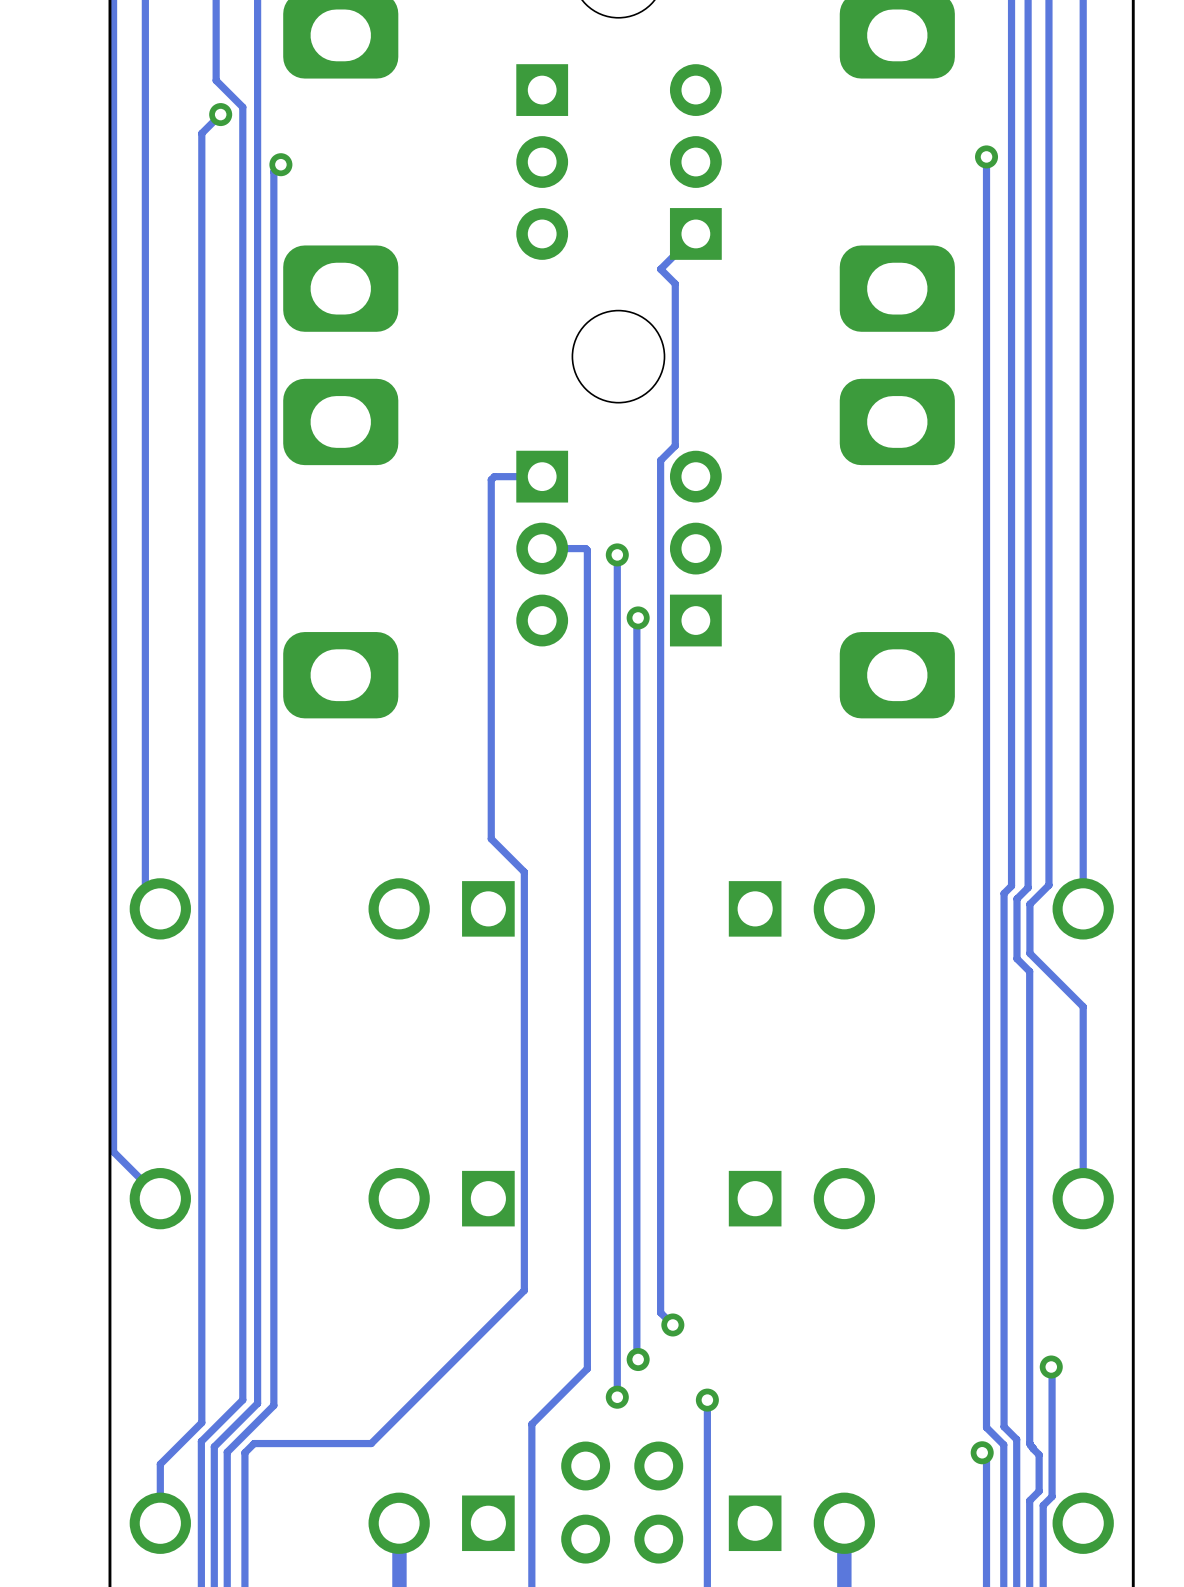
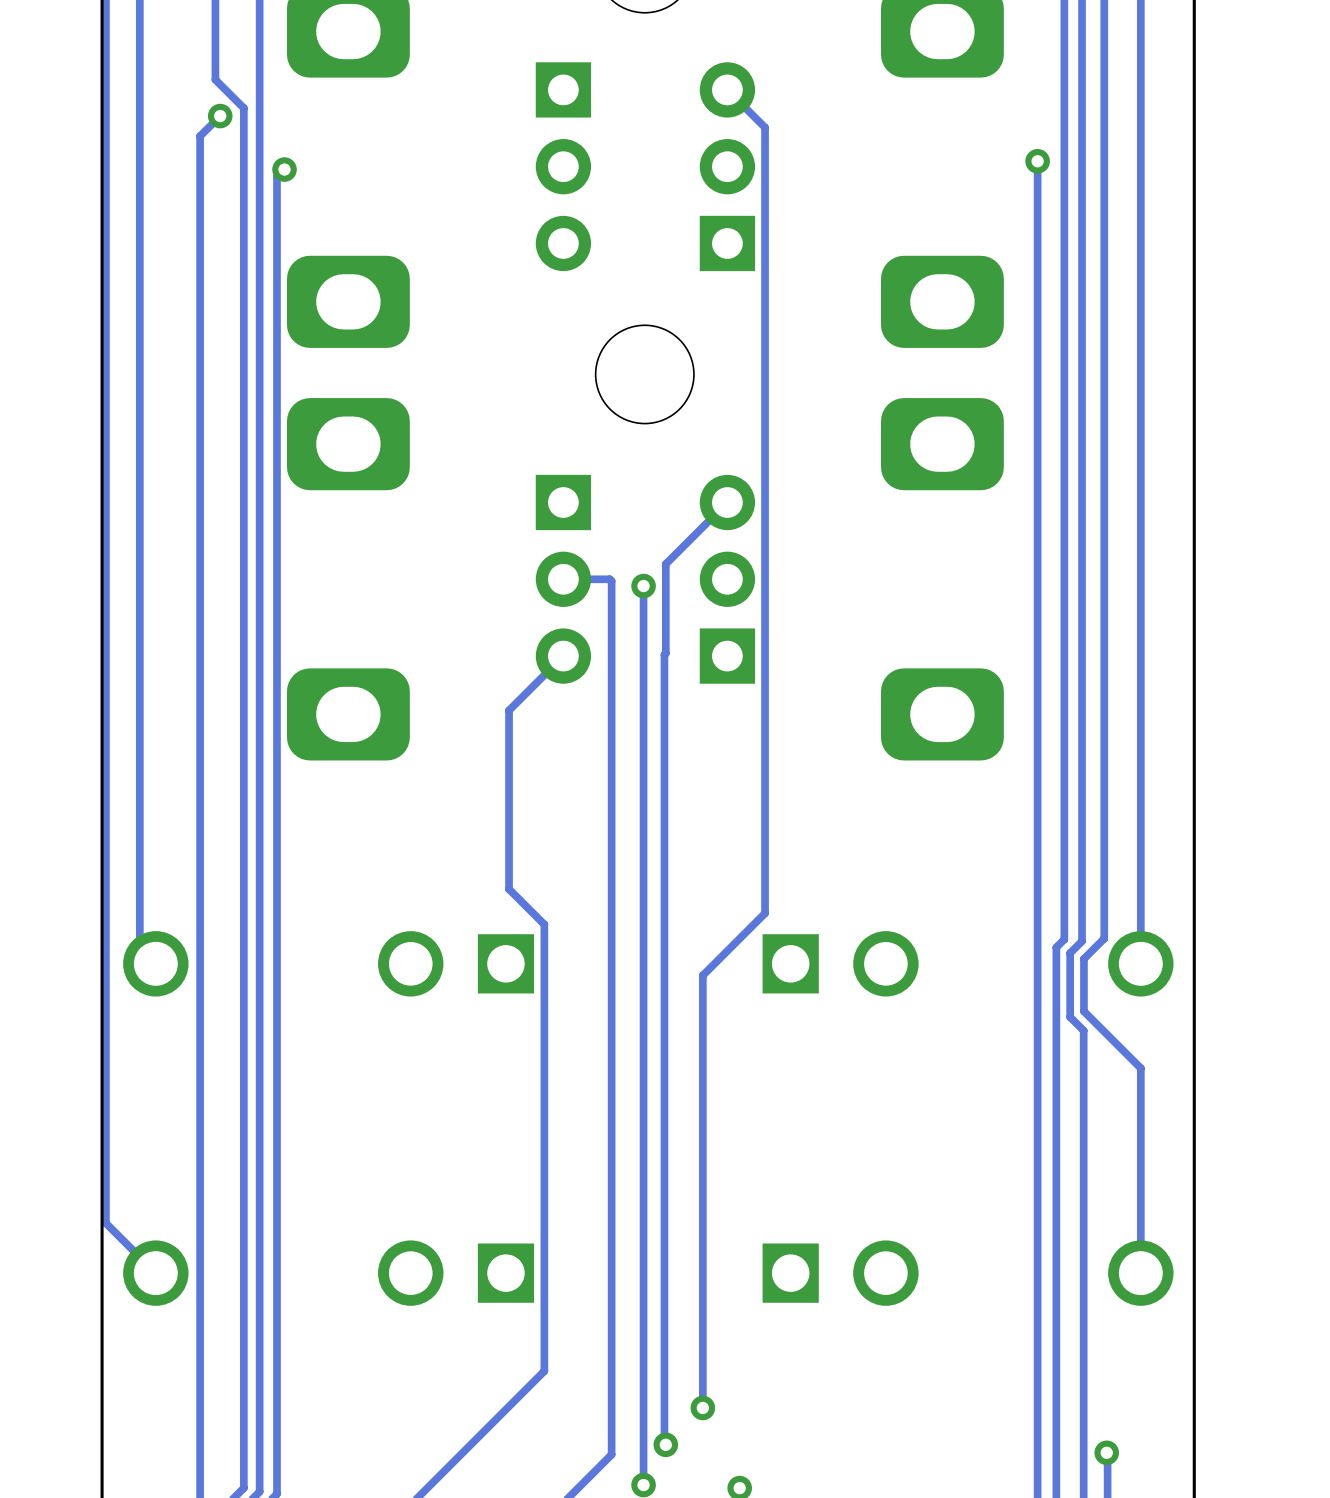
track: (695, 233) (660, 269) (675, 283) (675, 445) (660, 460) (660, 1312) (672, 1324) -> (727, 89) (765, 127) (765, 913) (702, 975) (702, 1407)
track: (542, 476) (494, 476) (491, 479) (491, 671) -> (563, 656) (509, 710)
track: none -> (727, 502) (665, 564) (665, 653)
via: (638, 617) -> none

